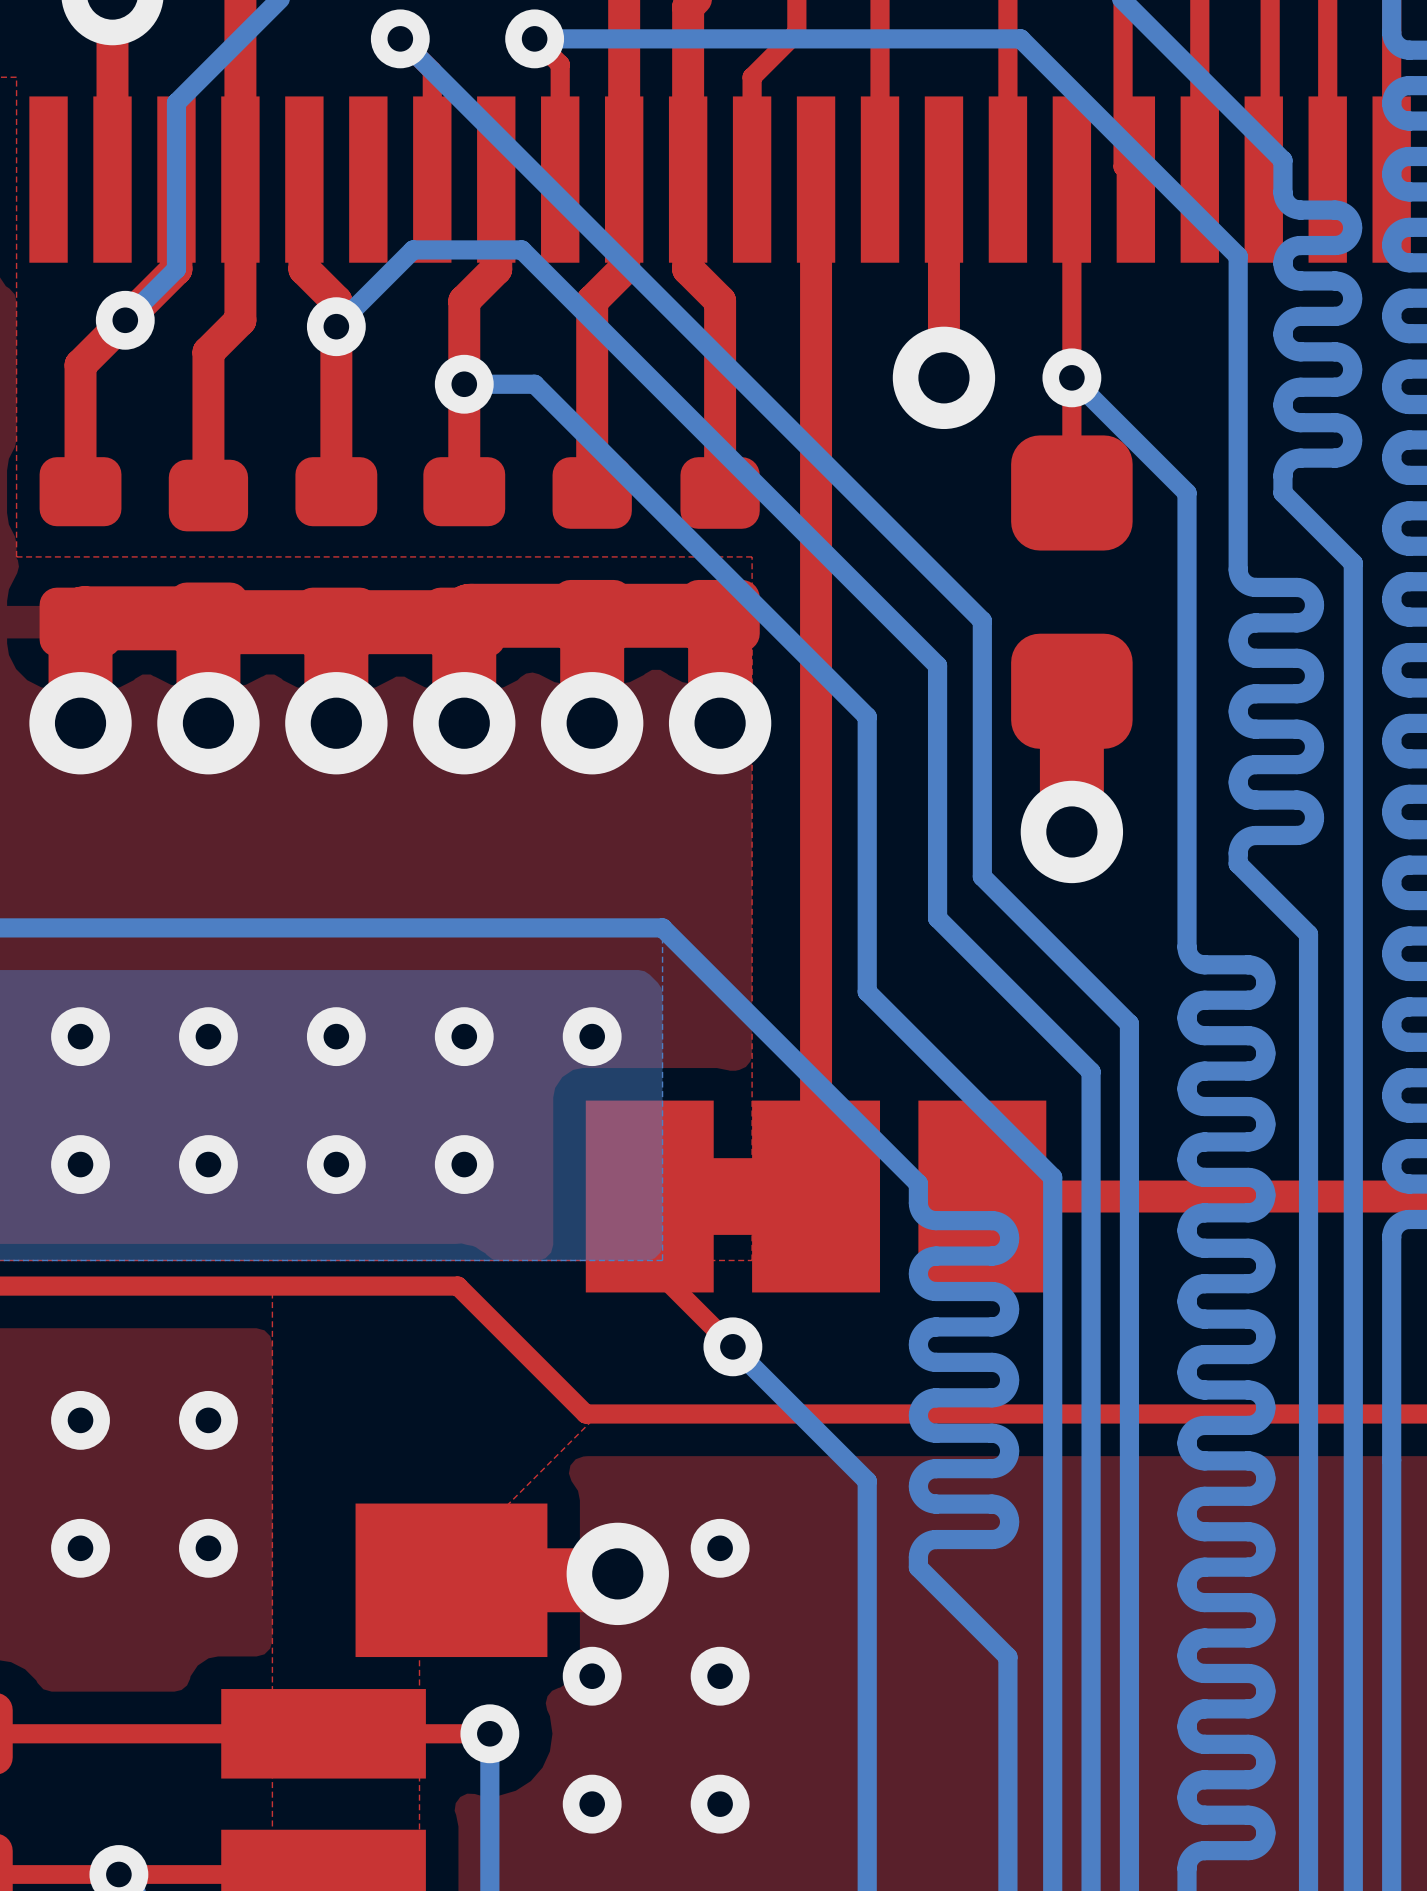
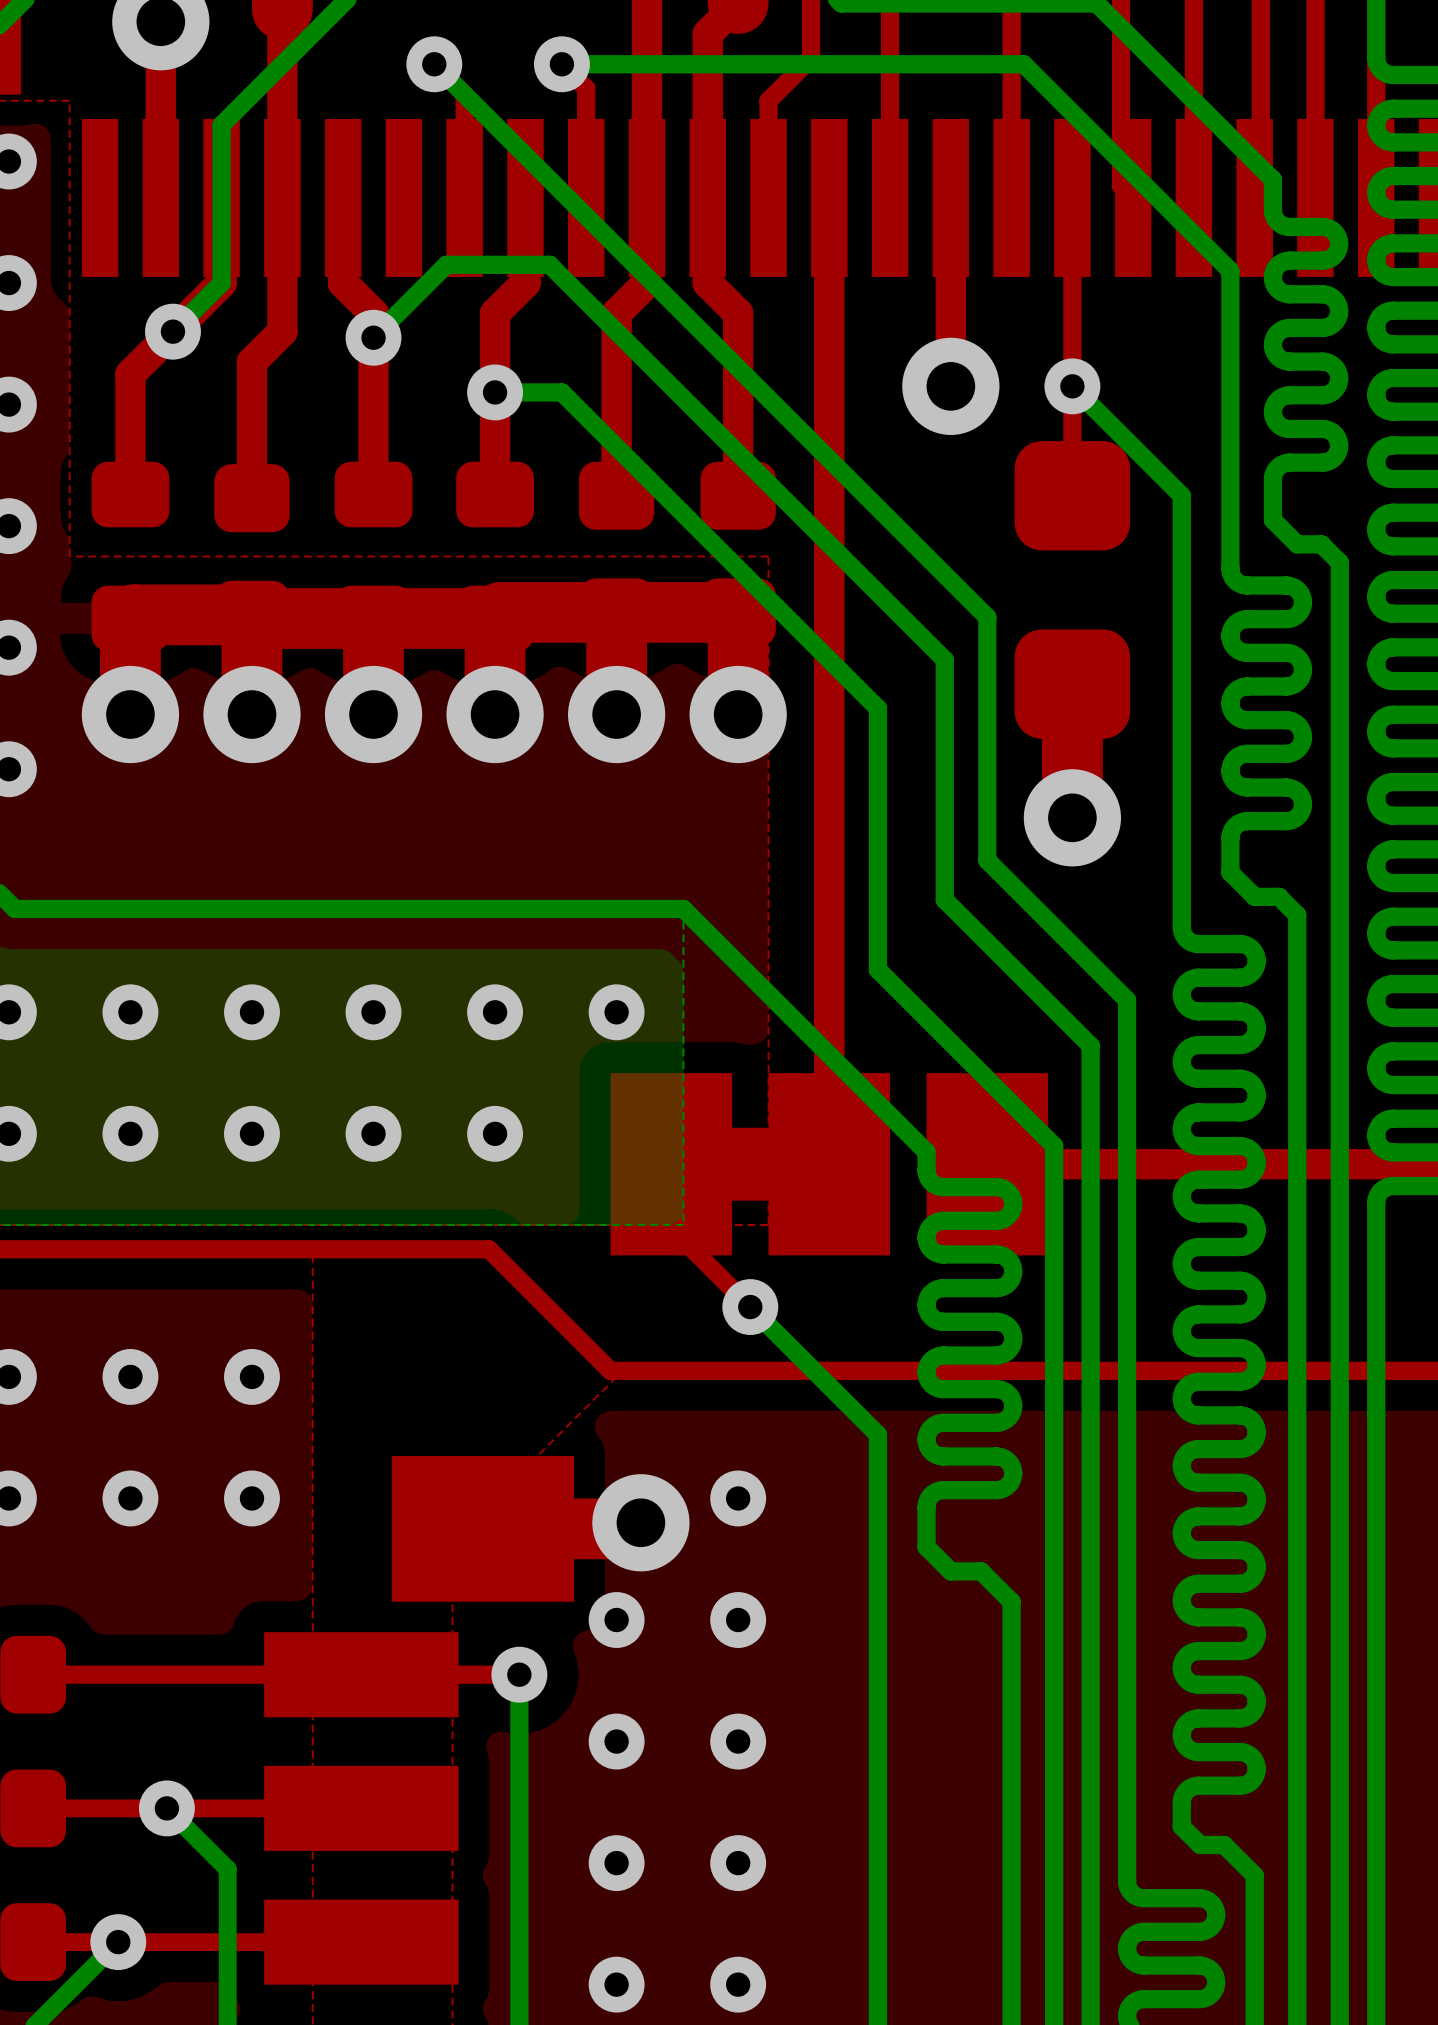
bottom track: (1282, 492) (1334, 544) -> (1272, 495) (1272, 520) (1297, 544) (1321, 544)
bottom track: (1238, 863) (1289, 915) -> (1230, 848) (1230, 872) (1254, 896) (1279, 896)
bottom track: (918, 1567) (975, 1625) -> (926, 1516) (926, 1547) (950, 1571) (981, 1571)

